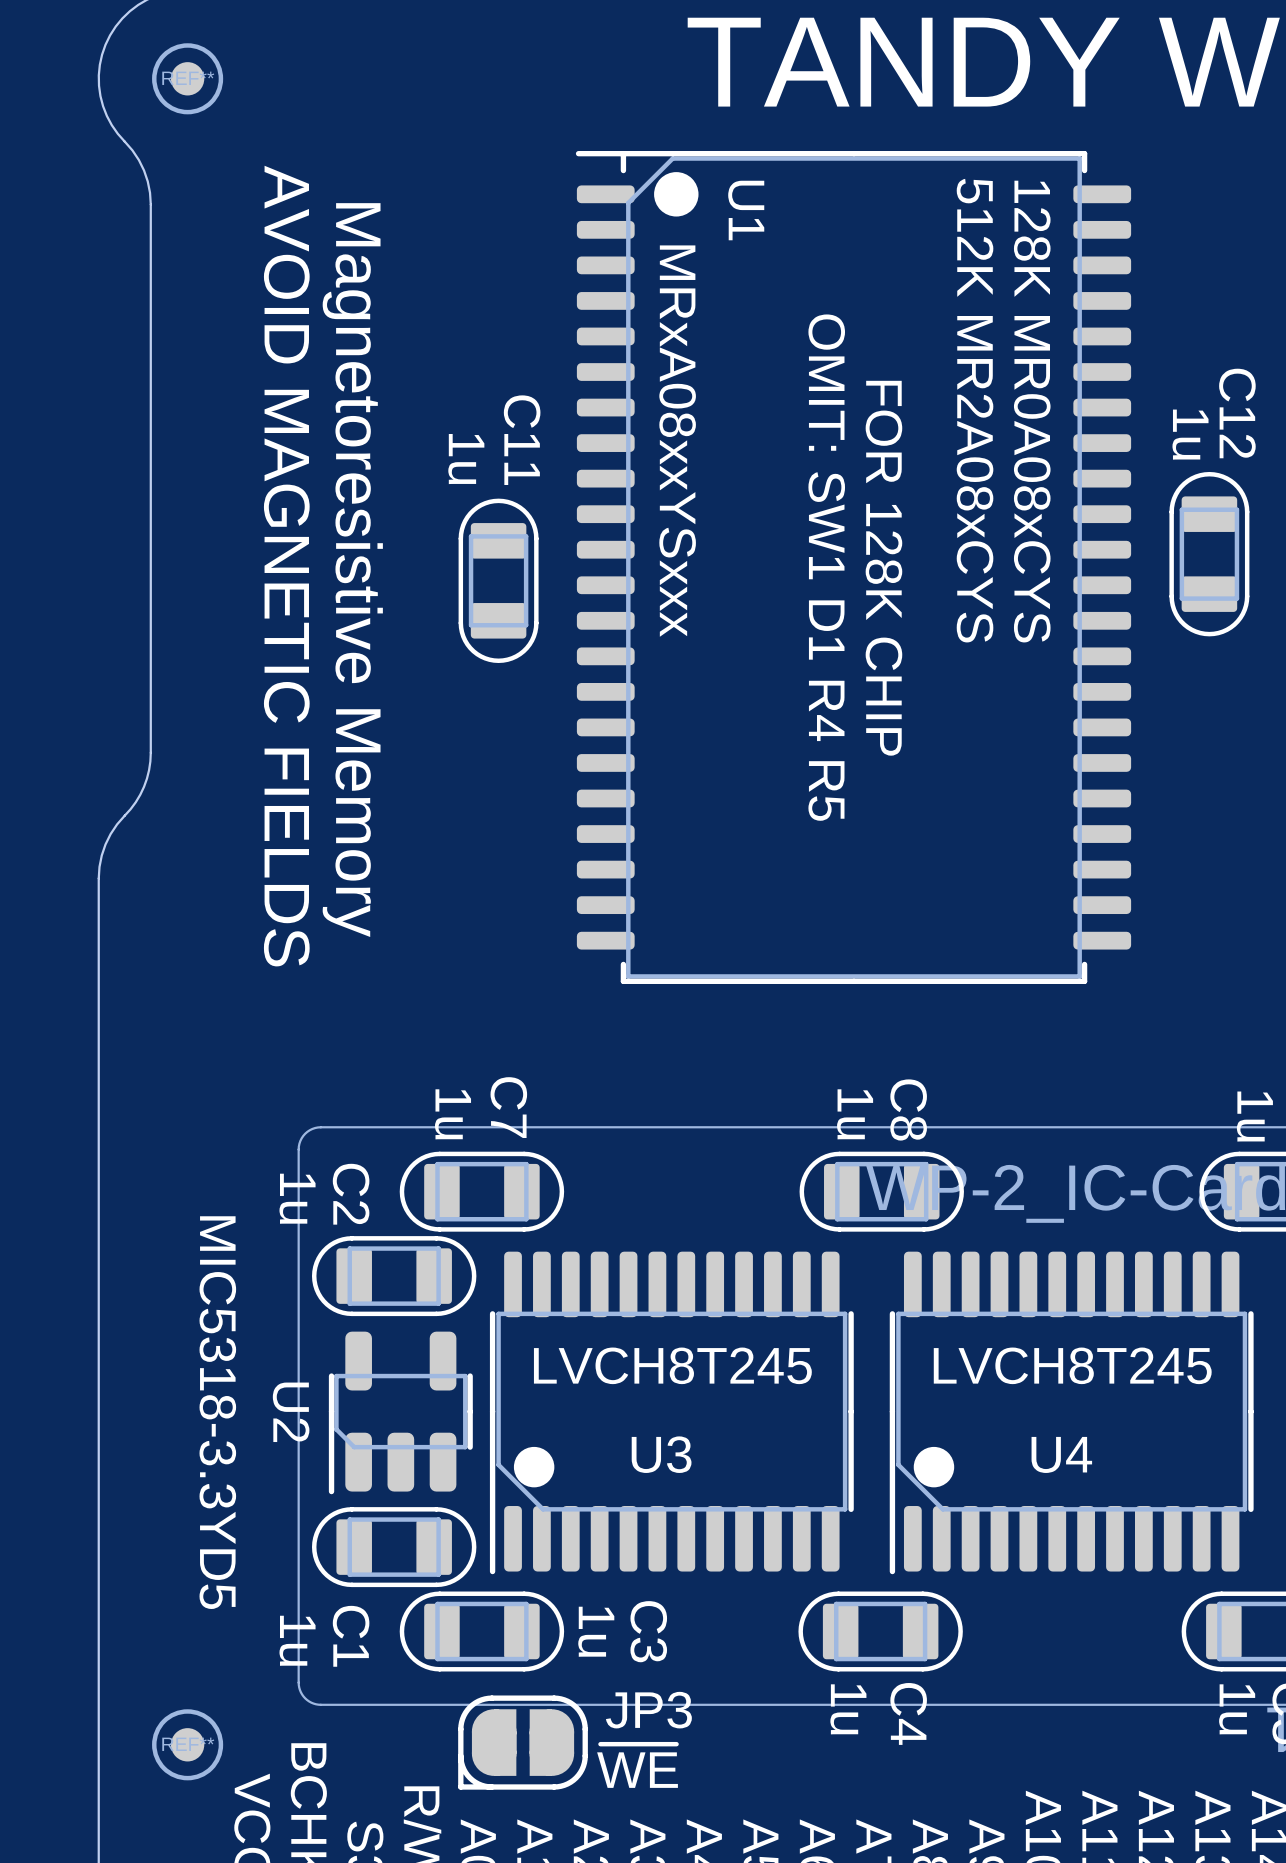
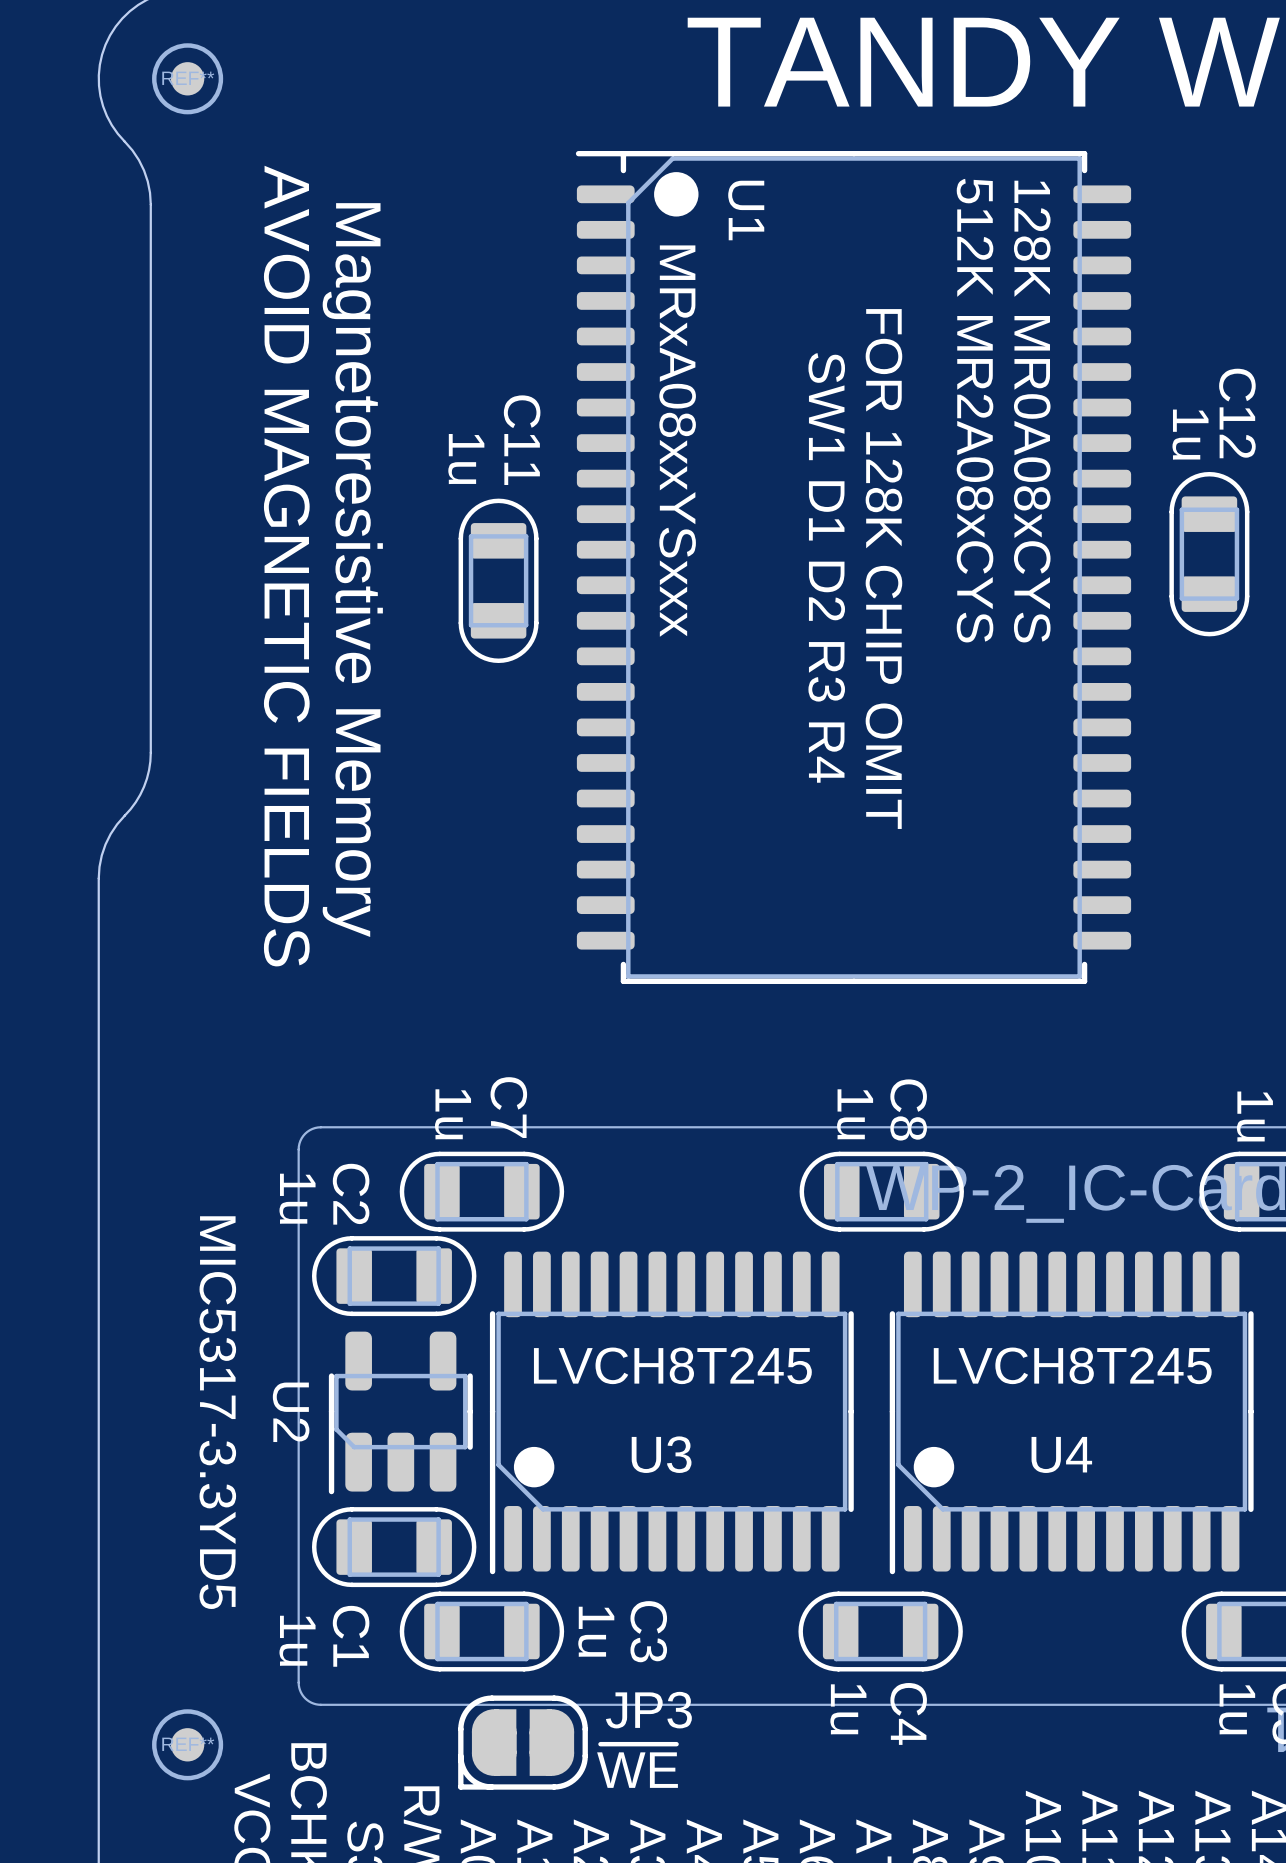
text: OMIT: SW1 D1 R4 R5 (826, 567) -> SW1 D1 D2 R3 R4 (826, 567)
text: FOR 128K CHIP (883, 568) -> FOR 128K CHIP OMIT (883, 569)
U2 value: MIC5318-3.3YD5 (217, 1412) -> MIC5317-3.3YD5 (217, 1412)

